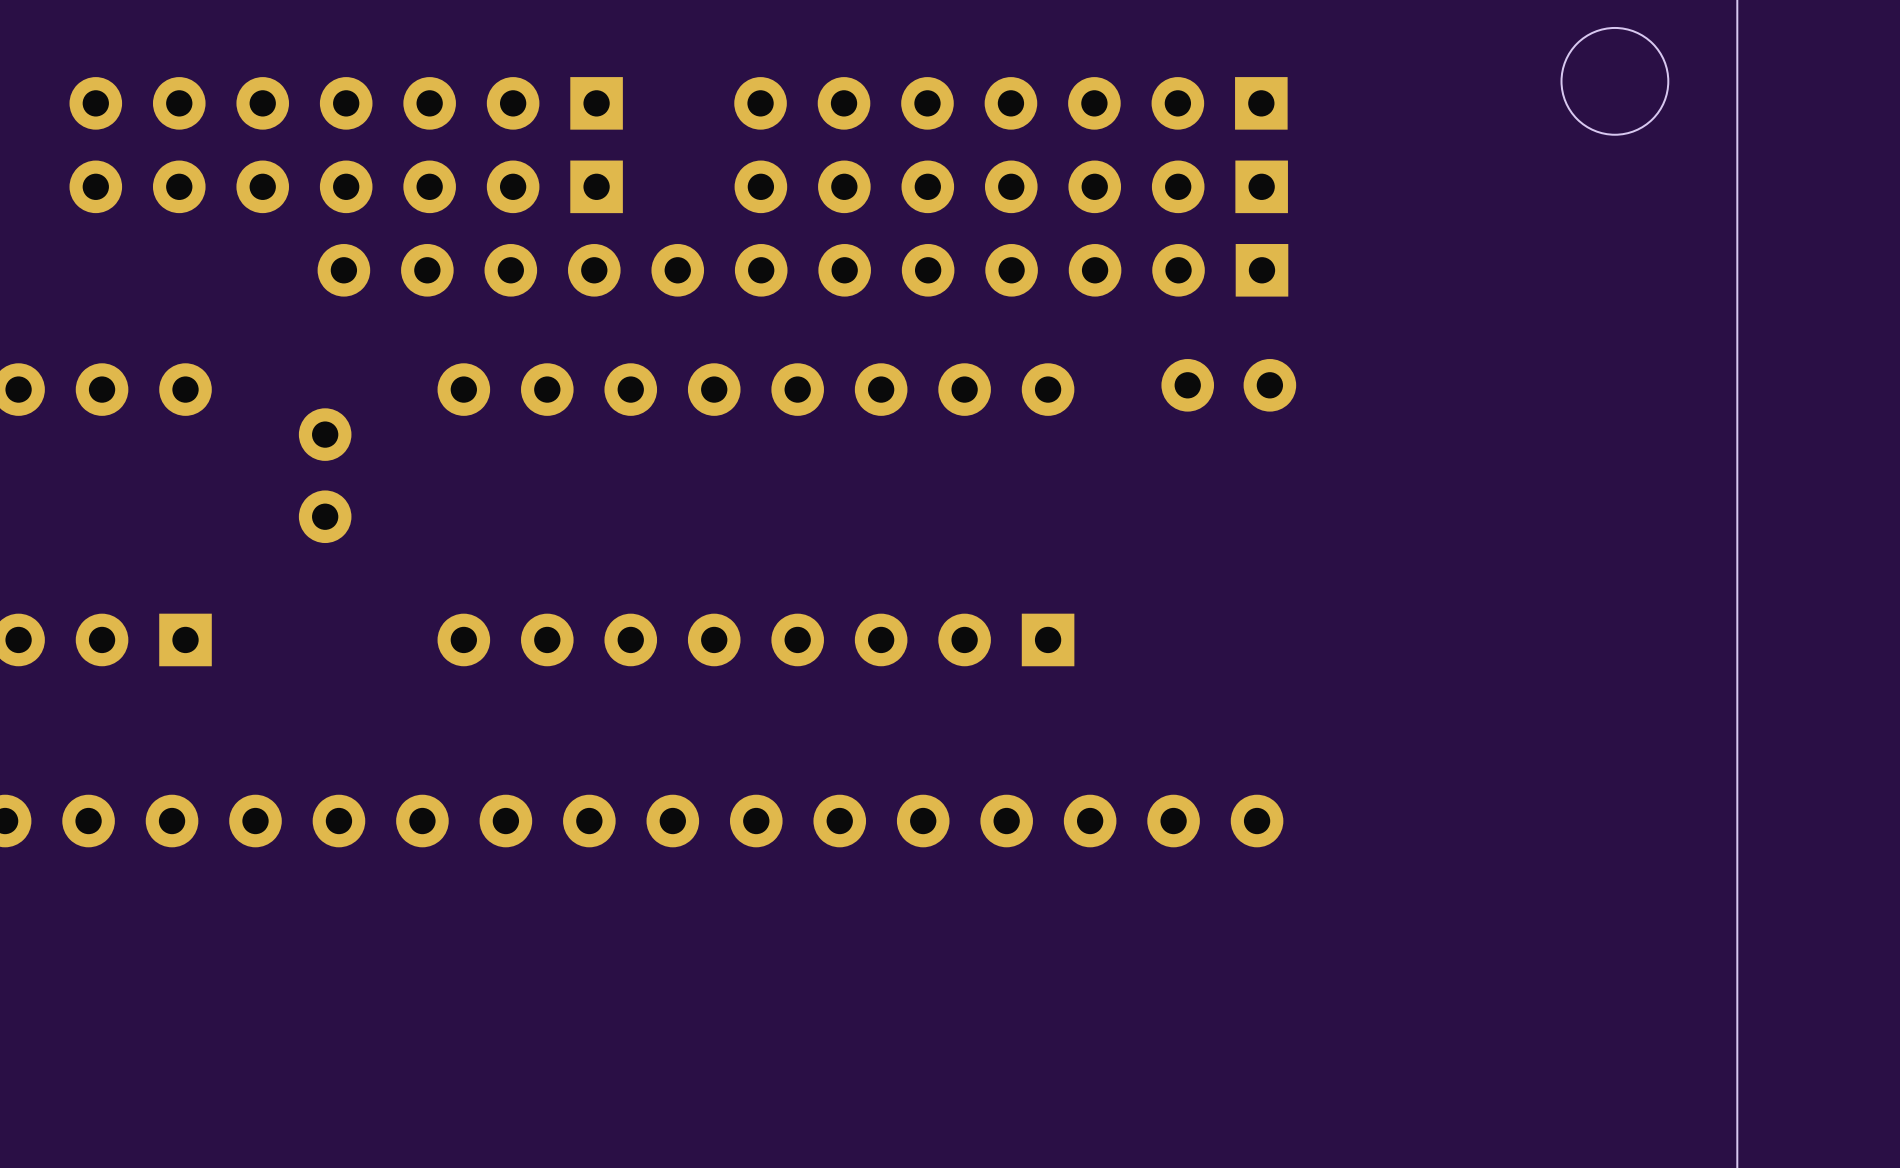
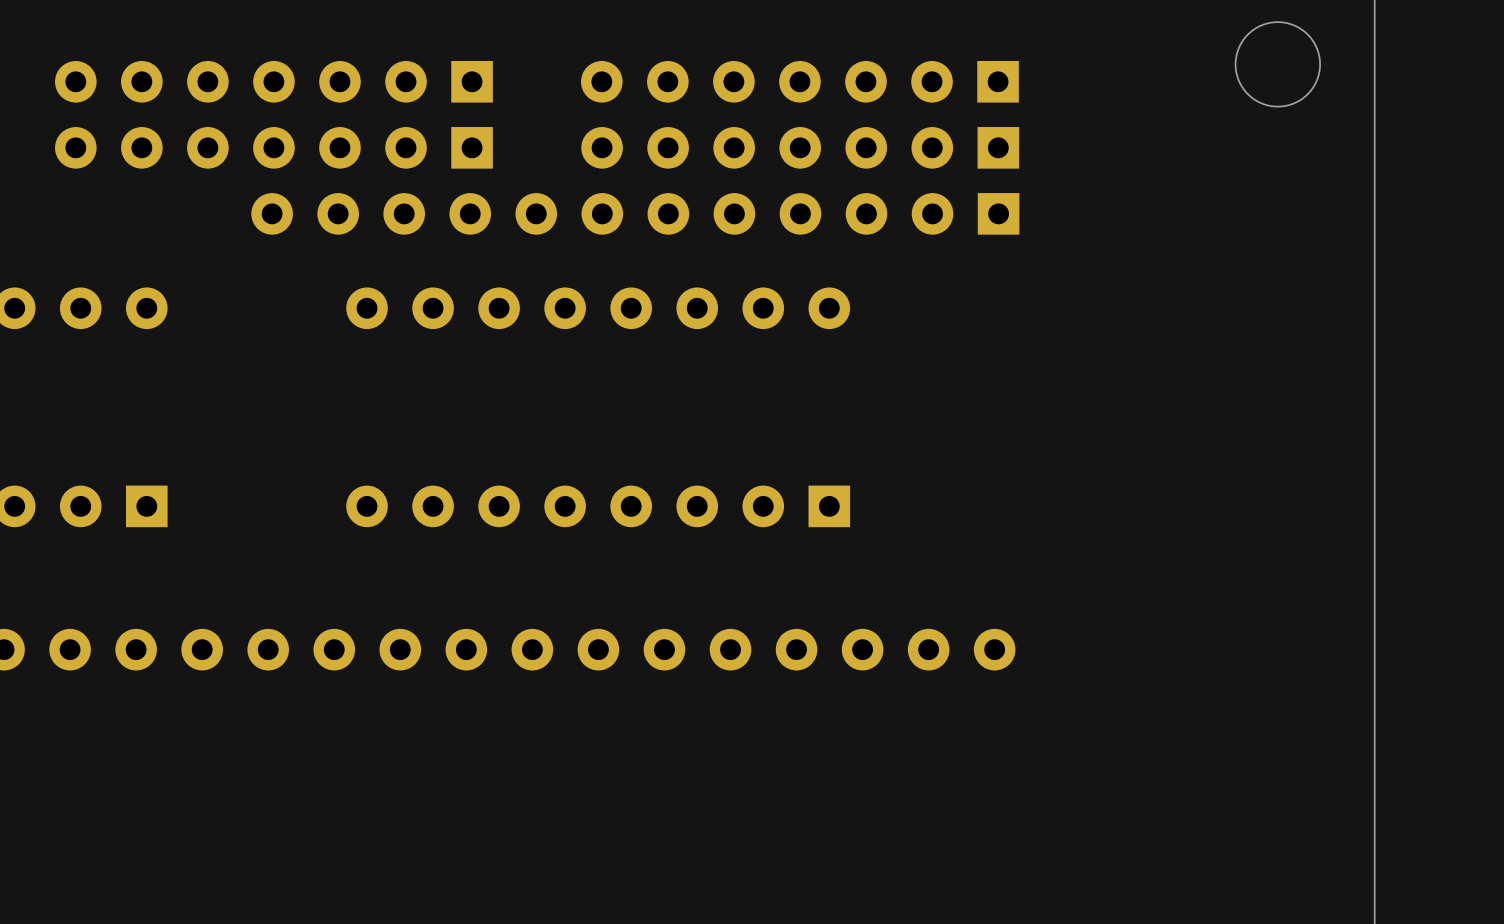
part: (1228, 385) -> none
part: (325, 475) -> none

